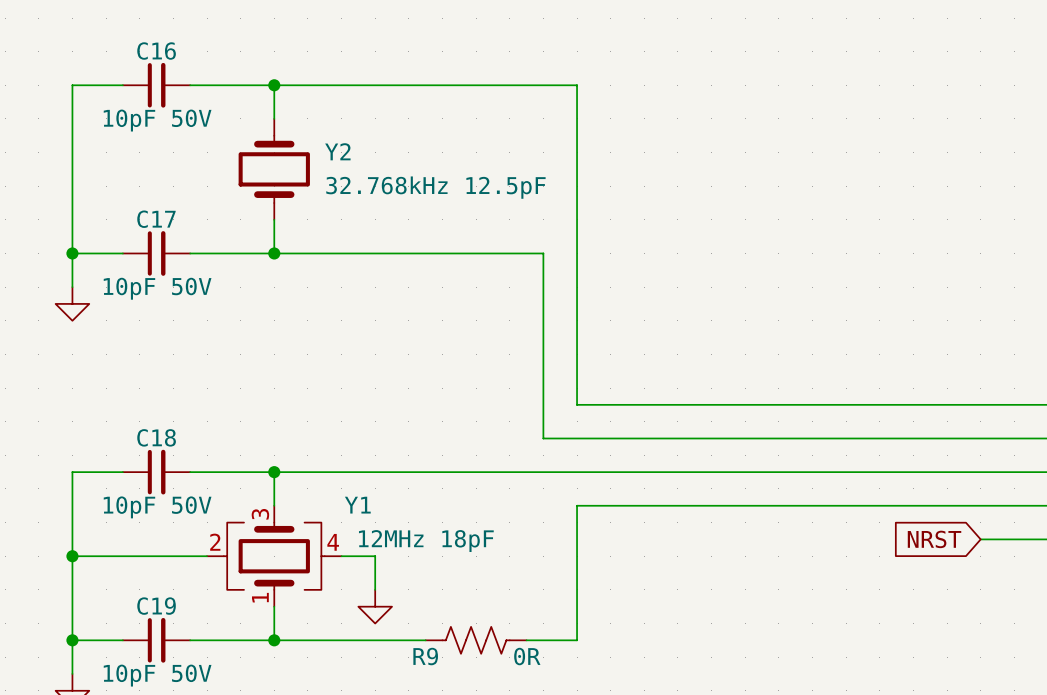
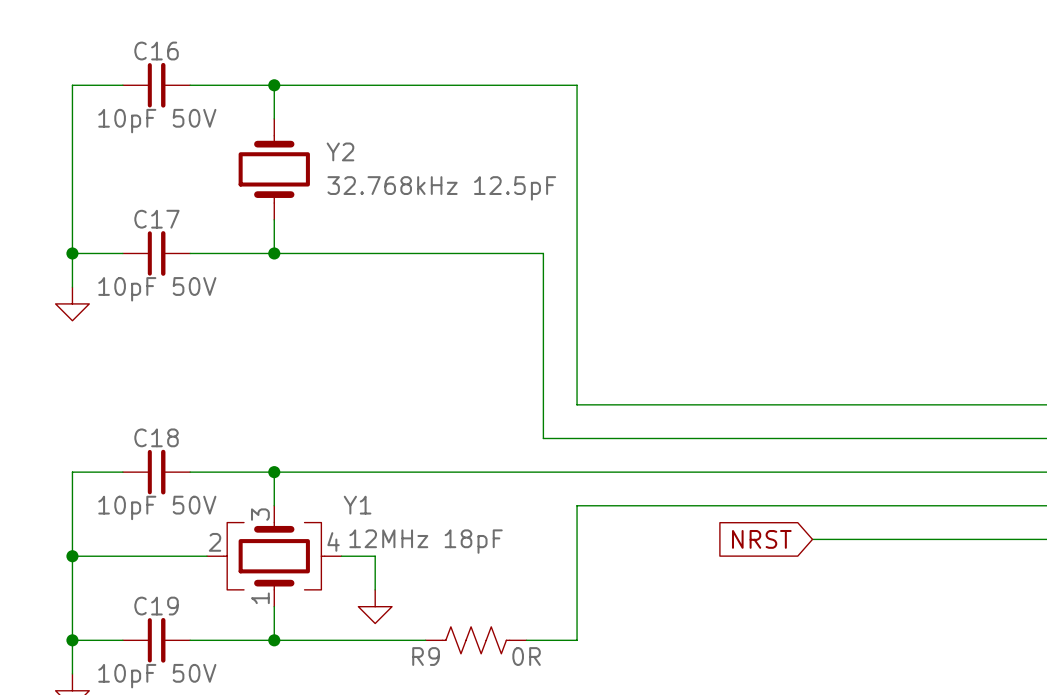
wire: none -> (812, 539) (980, 539)
global label position: NRST (934, 539) -> NRST (761, 539)

